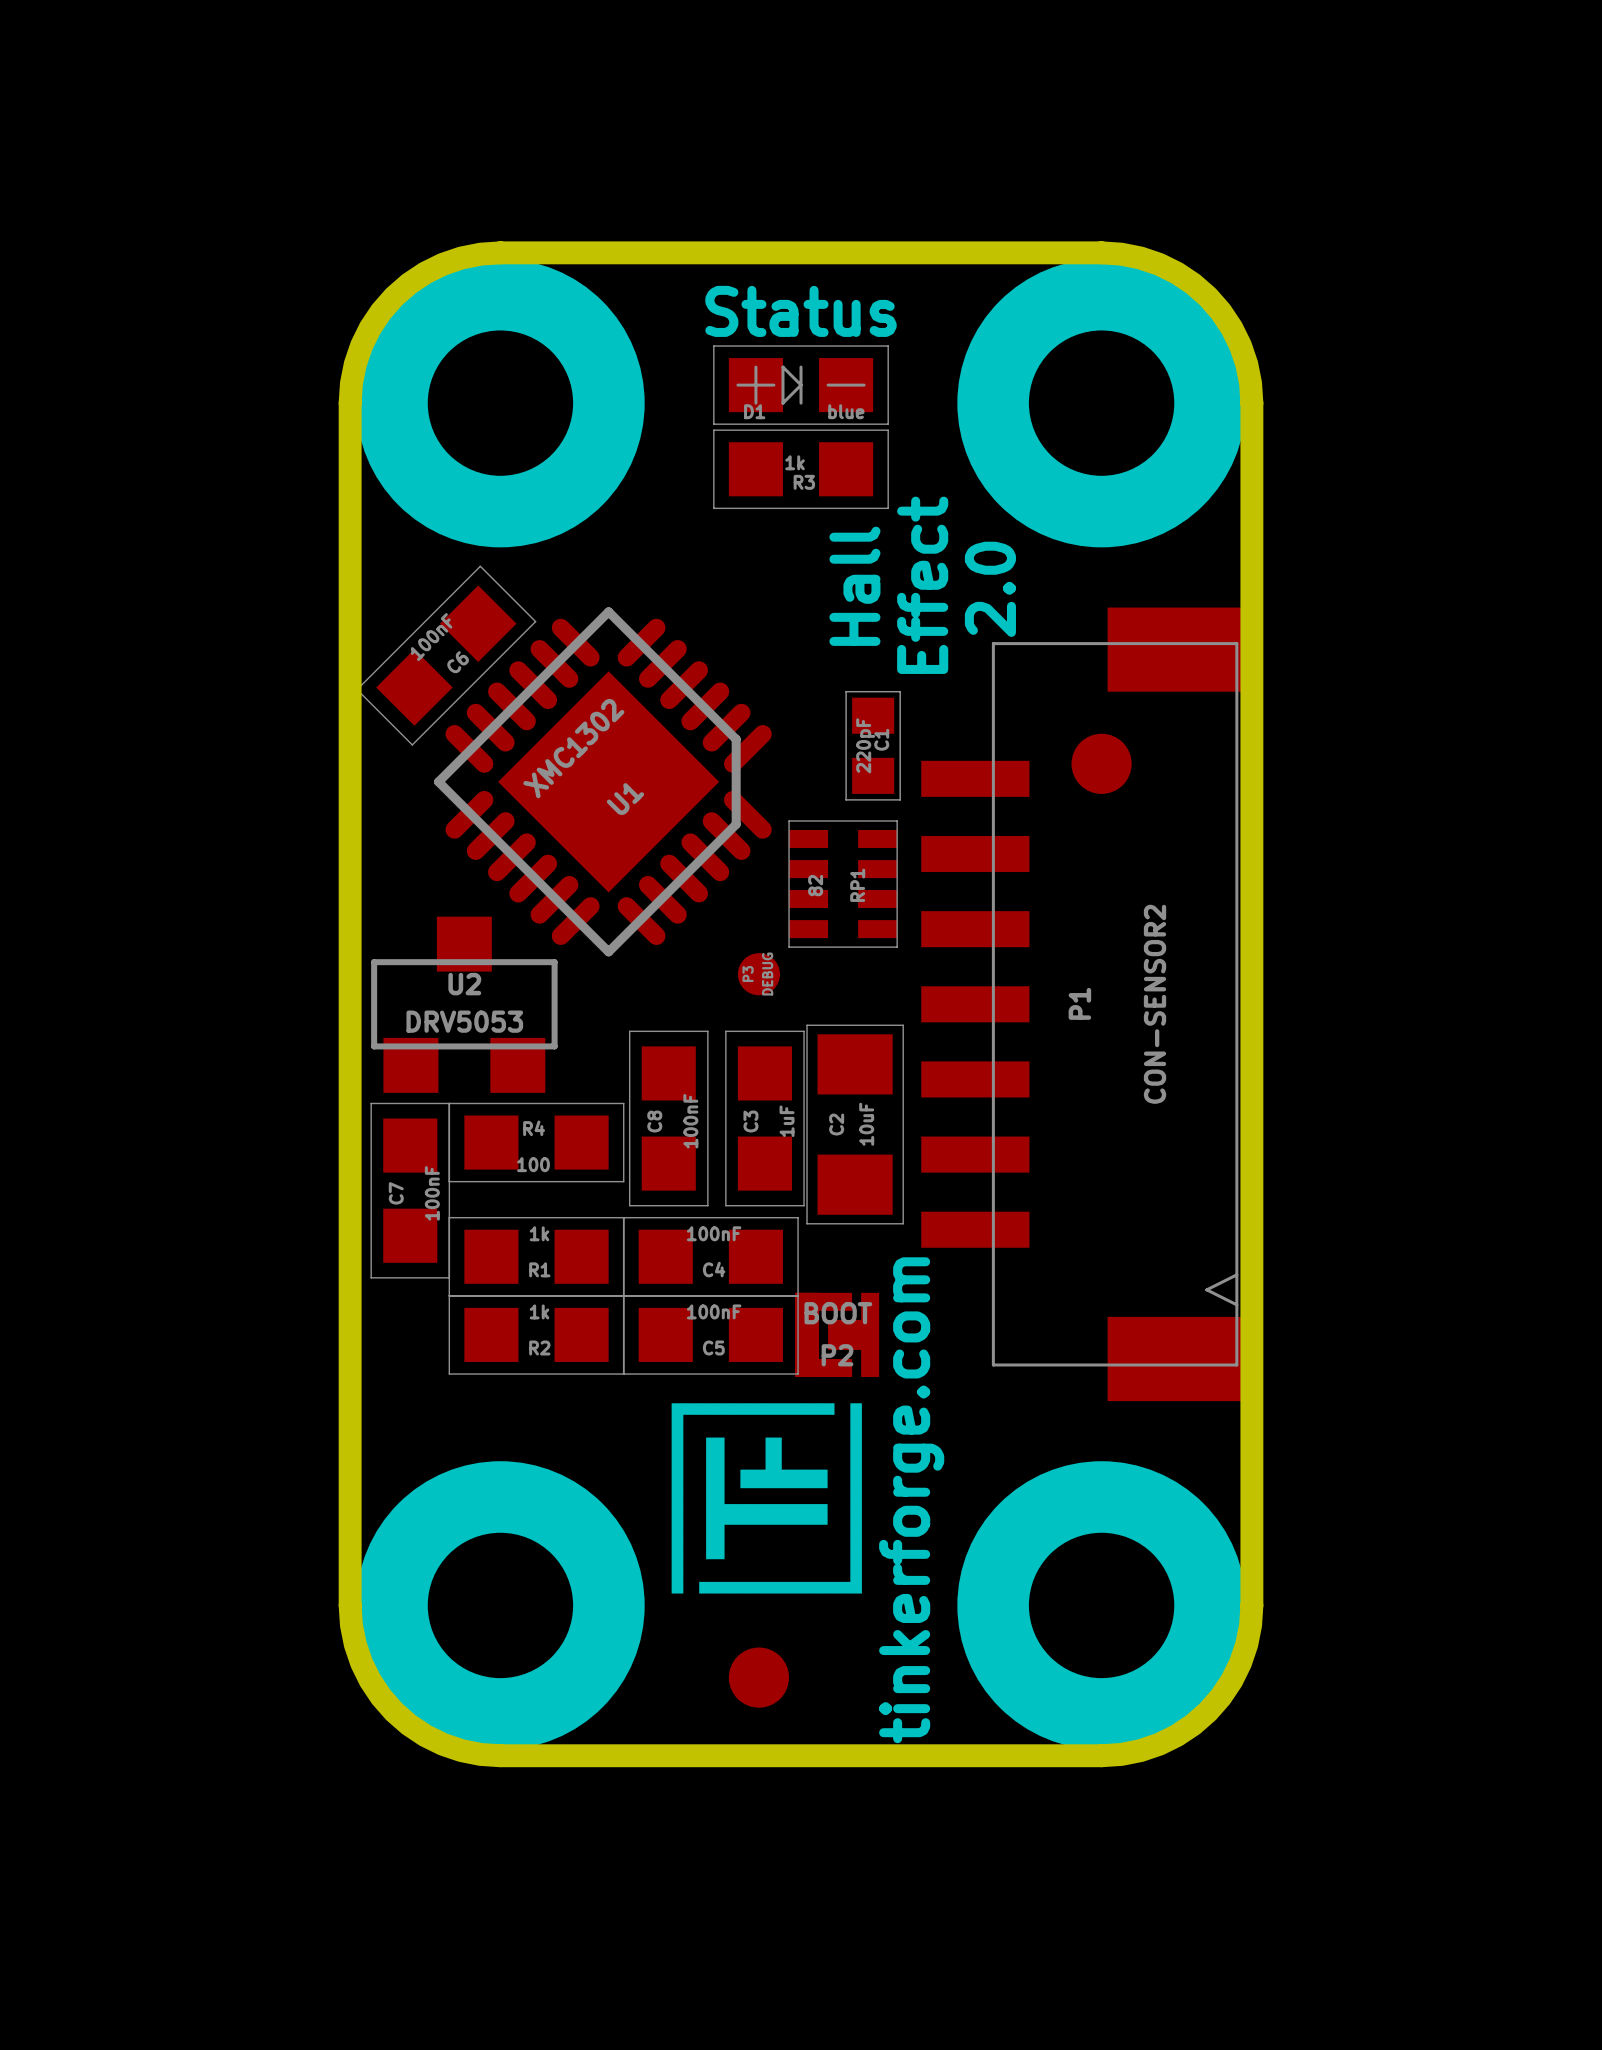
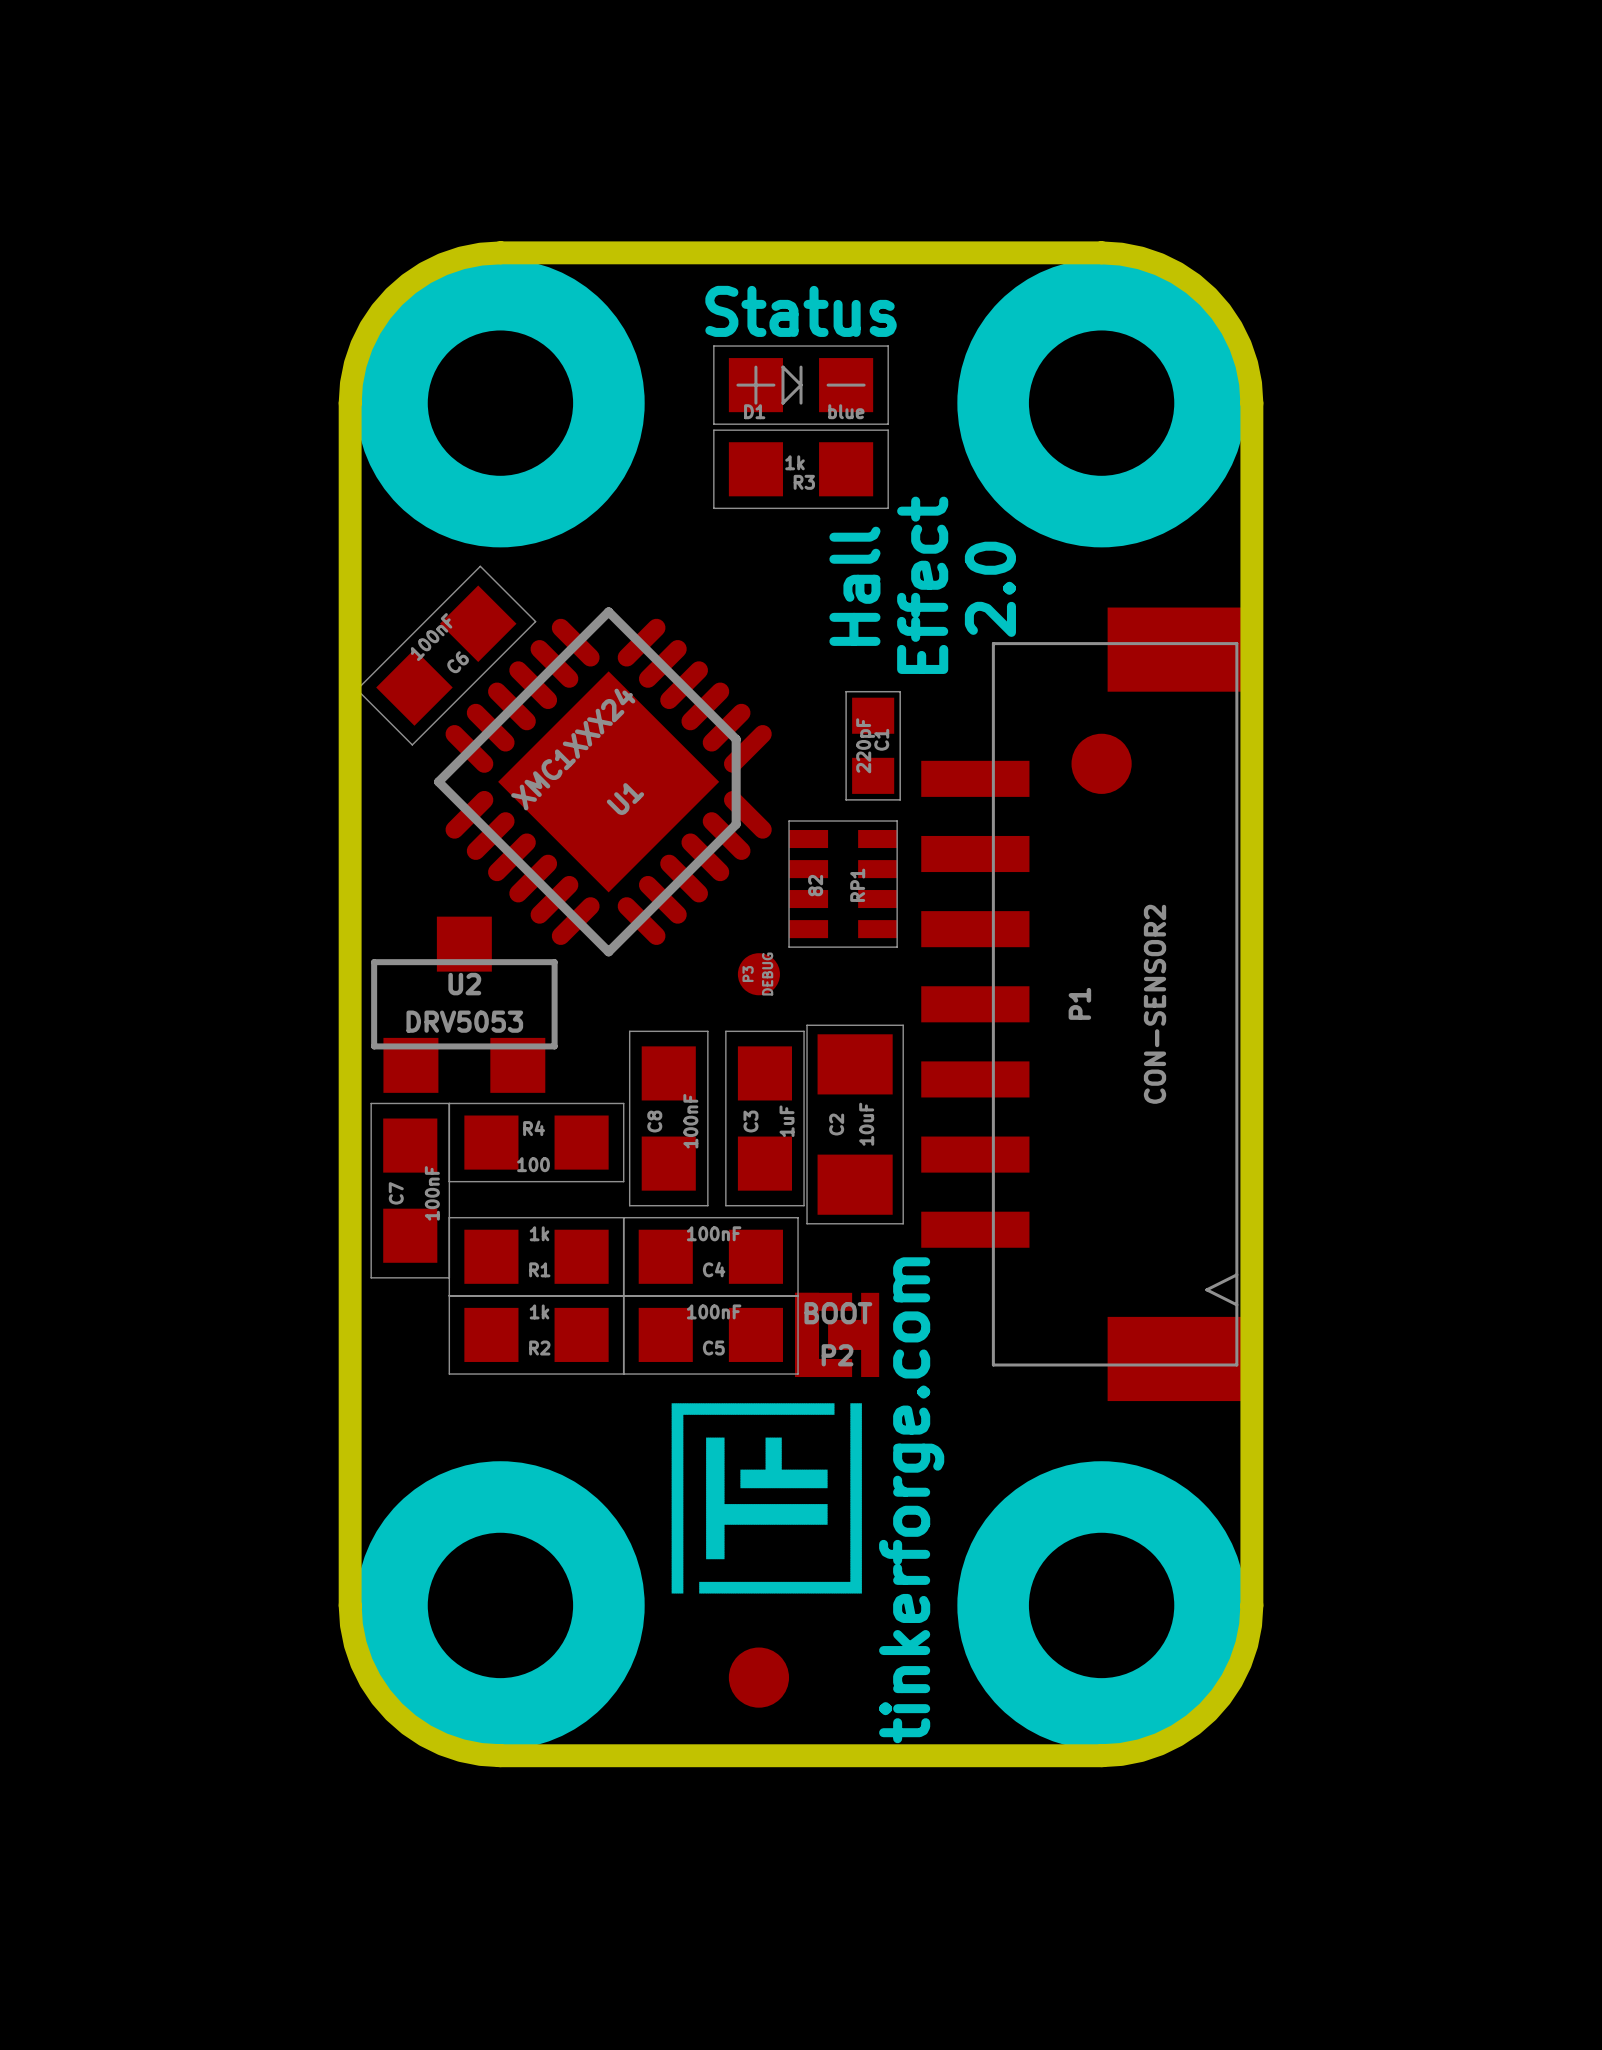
U1 value: XMC1302 (573, 748) -> XMC1XXX24 (573, 749)

